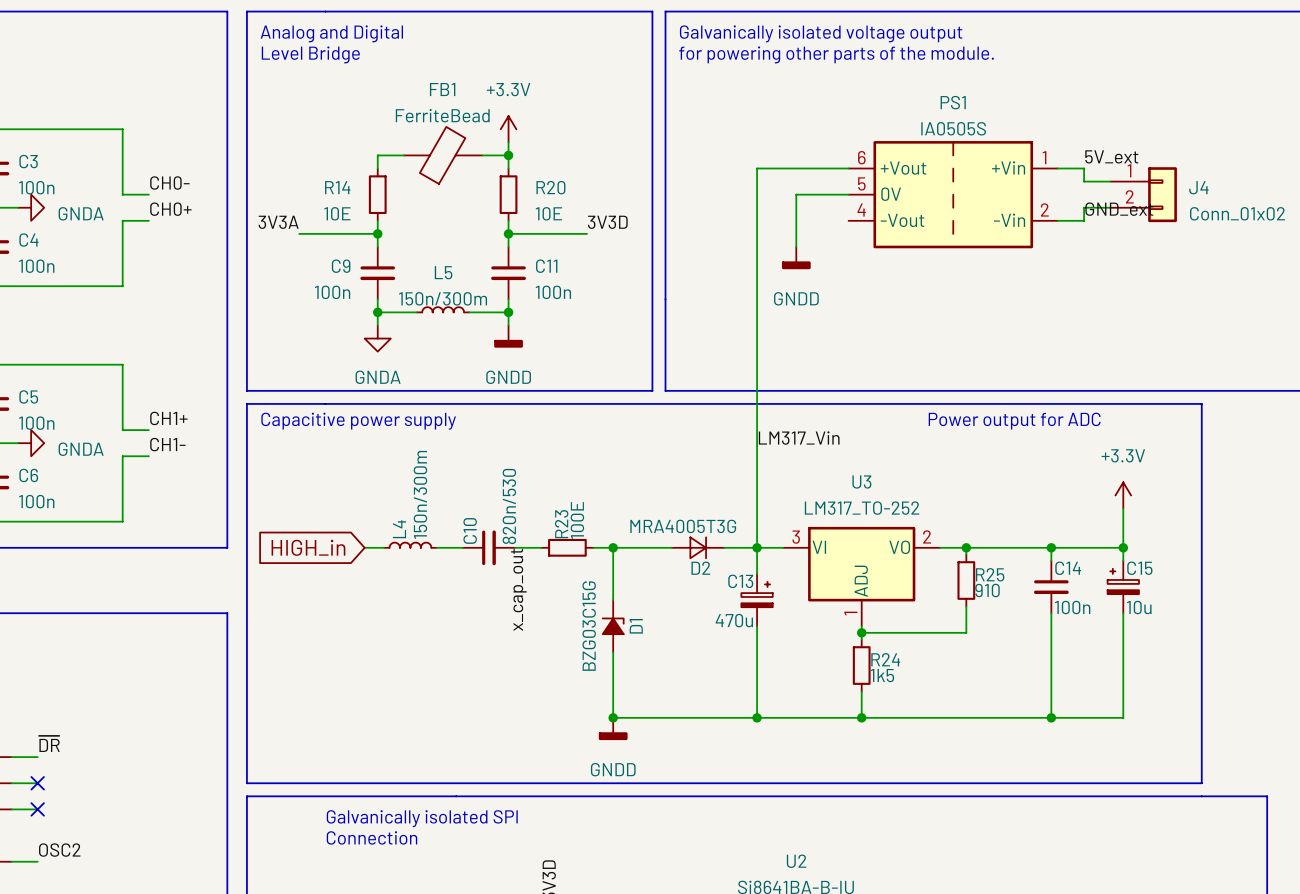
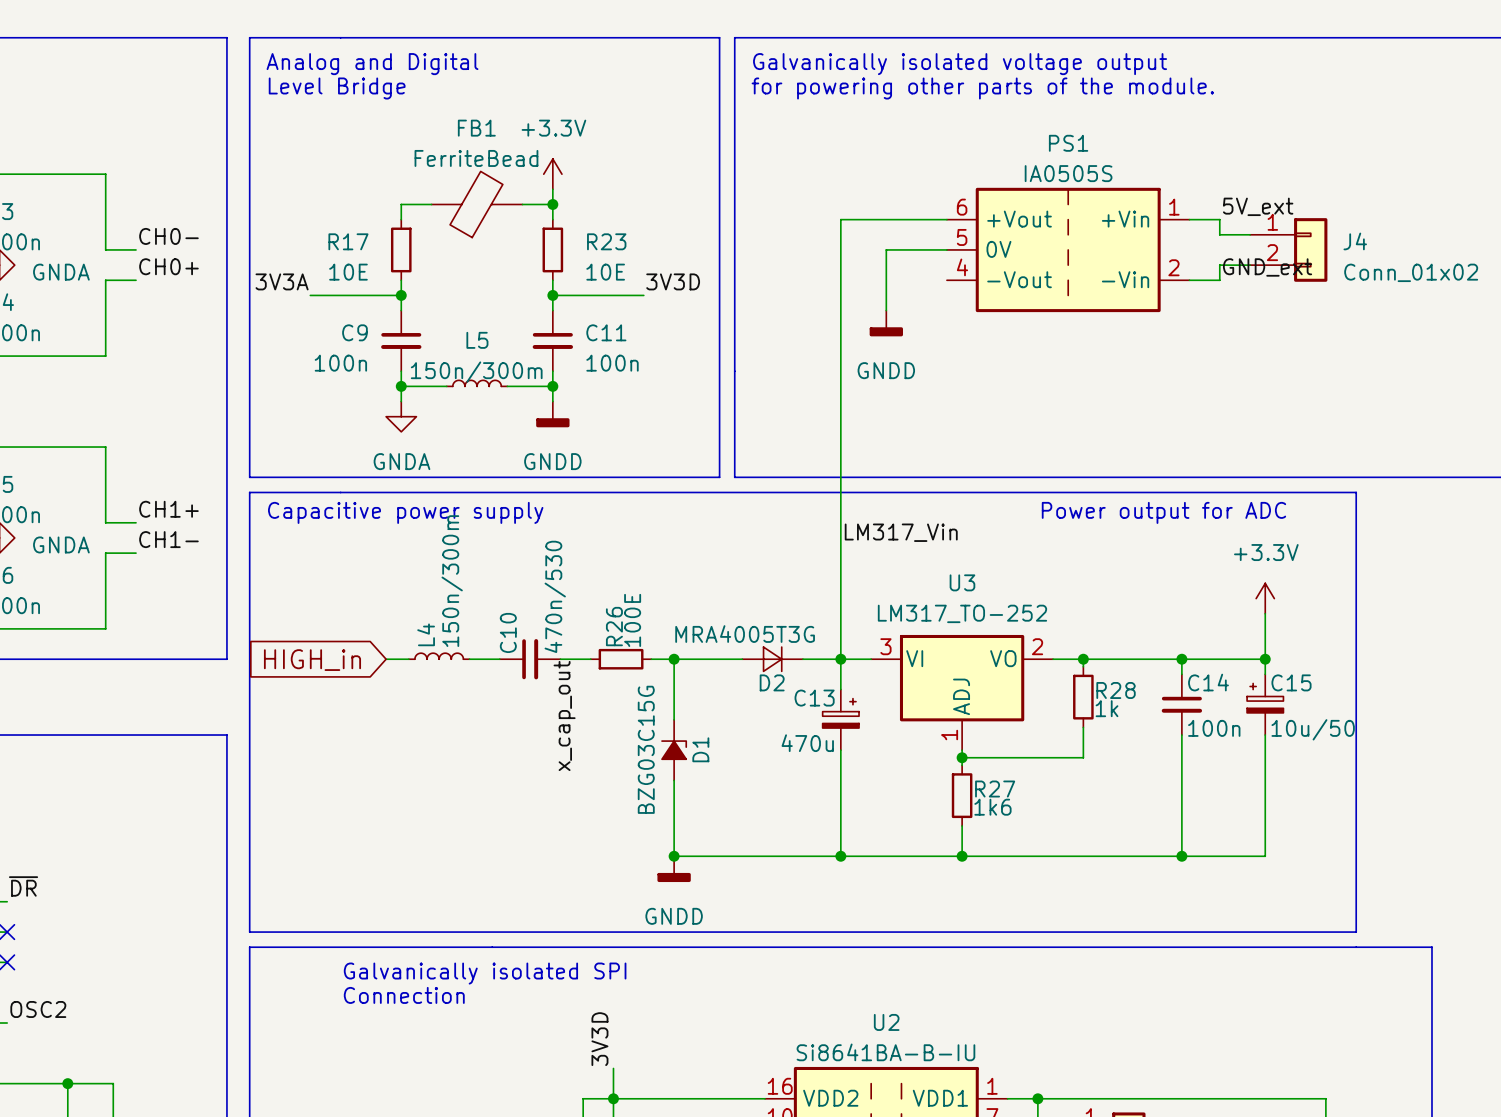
R14 name: R14 (337, 187) -> R17 (348, 241)
R20 name: R20 (550, 187) -> R23 (606, 241)
C10 value: 820n/530 (509, 506) -> 470n/530 (555, 596)
R23 name: R23 (561, 524) -> R26 (614, 626)
R25 name: R25 (990, 574) -> R28 (1116, 690)
R25 value: 910 (987, 590) -> 1k (1107, 708)
C15 value: 10u (1139, 607) -> 10u/50 (1313, 729)
R24 name: R24 (885, 659) -> R27 (995, 789)
R24 value: 1k5 (882, 675) -> 1k6 (992, 807)

